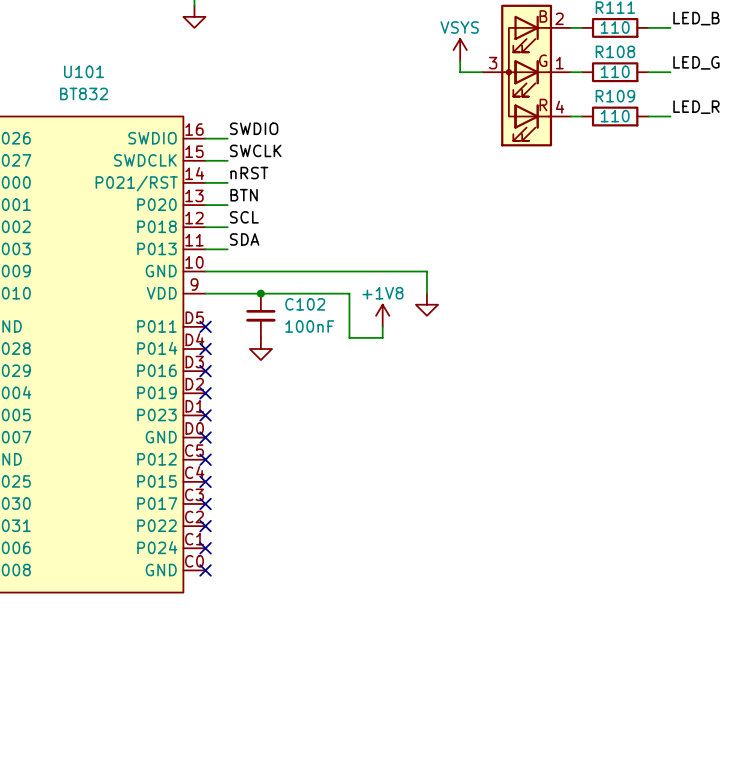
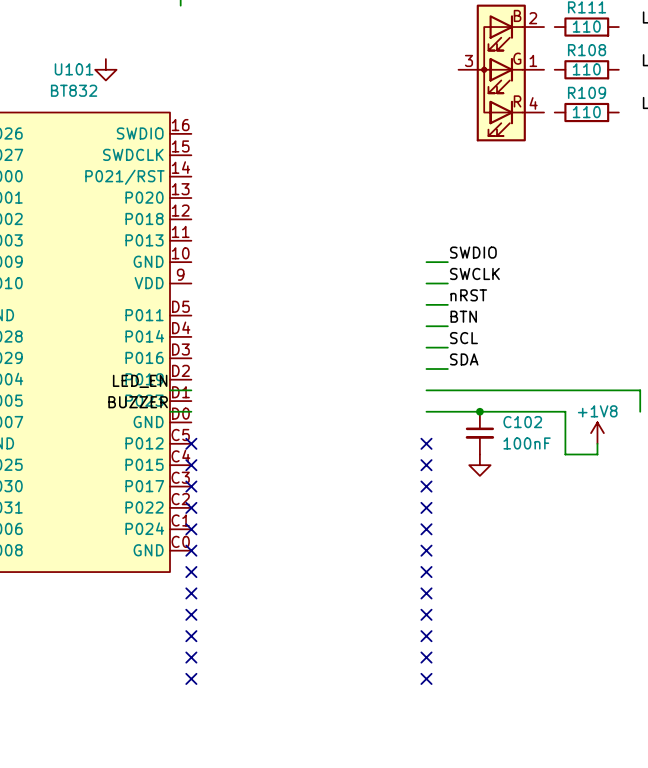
power symbol position: (194, 16) -> (105, 69)
wire: (570, 27) (581, 27) -> none
wire: (648, 27) (670, 27) -> none
power symbol: VSYS (460, 50) -> none
wire: (460, 61) (460, 72) (482, 72) -> none
wire: (570, 72) (581, 72) -> none
wire: (648, 72) (670, 72) -> none
wire: (570, 116) (581, 116) -> none
wire: (648, 116) (670, 116) -> none
label: SWDIO (254, 128) -> none
wire: (205, 138) (227, 138) -> none
label: SWCLK (255, 150) -> none
wire: (205, 160) (227, 160) -> none
label: nRST (249, 173) -> none
wire: (205, 182) (227, 182) -> none
label: BTN (244, 195) -> none
wire: (205, 205) (227, 205) -> none
label: SCL (244, 217) -> none
wire: (205, 227) (227, 227) -> (170, 390) (191, 390)
label: SDA (244, 239) -> none
wire: (205, 249) (227, 249) -> (170, 411) (191, 411)
label: none -> SWDIO (473, 252)
wire: (205, 271) (426, 271) (426, 293) -> none
wire: none -> (426, 262) (447, 262)
label: none -> SWCLK (474, 273)
wire: (205, 293) (349, 293) (349, 337) (382, 337) (382, 326) -> none
junction: (260, 293) -> none
wire: none -> (426, 283) (447, 283)
power symbol: (426, 304) -> none
label: none -> nRST (468, 295)
C102 position: (260, 315) -> (479, 433)
power symbol: +1V8 (382, 315) -> none
wire: none -> (426, 304) (447, 304)
no-connect mark: (205, 326) -> none
label: none -> BTN (463, 316)
wire: none -> (426, 326) (447, 326)
no-connect mark: (205, 349) -> none
power symbol: (260, 349) -> none
label: none -> SCL (463, 338)
wire: none -> (426, 347) (447, 347)
no-connect mark: (205, 371) -> none
label: none -> SDA (464, 359)
wire: none -> (426, 369) (447, 369)
no-connect mark: (205, 393) -> none
label: none -> LED_EN (140, 381)
wire: none -> (426, 390) (640, 390) (640, 411)
no-connect mark: (205, 415) -> none
label: none -> BUZZER (138, 402)
wire: none -> (426, 411) (565, 411) (565, 454) (597, 454) (597, 443)
junction: none -> (479, 411)
no-connect mark: (205, 437) -> none
power symbol: none -> +1V8 (597, 433)
no-connect mark: none -> (426, 443)
no-connect mark: none -> (426, 465)
power symbol: none -> (479, 465)
no-connect mark: none -> (426, 486)
no-connect mark: none -> (426, 507)
no-connect mark: none -> (426, 529)
no-connect mark: none -> (426, 550)
no-connect mark: none -> (191, 572)
no-connect mark: none -> (426, 572)
no-connect mark: none -> (191, 593)
no-connect mark: none -> (426, 593)
no-connect mark: none -> (191, 614)
no-connect mark: none -> (426, 614)
no-connect mark: none -> (191, 636)
no-connect mark: none -> (426, 636)
no-connect mark: none -> (191, 657)
no-connect mark: none -> (426, 657)
no-connect mark: none -> (191, 678)
no-connect mark: none -> (426, 678)

